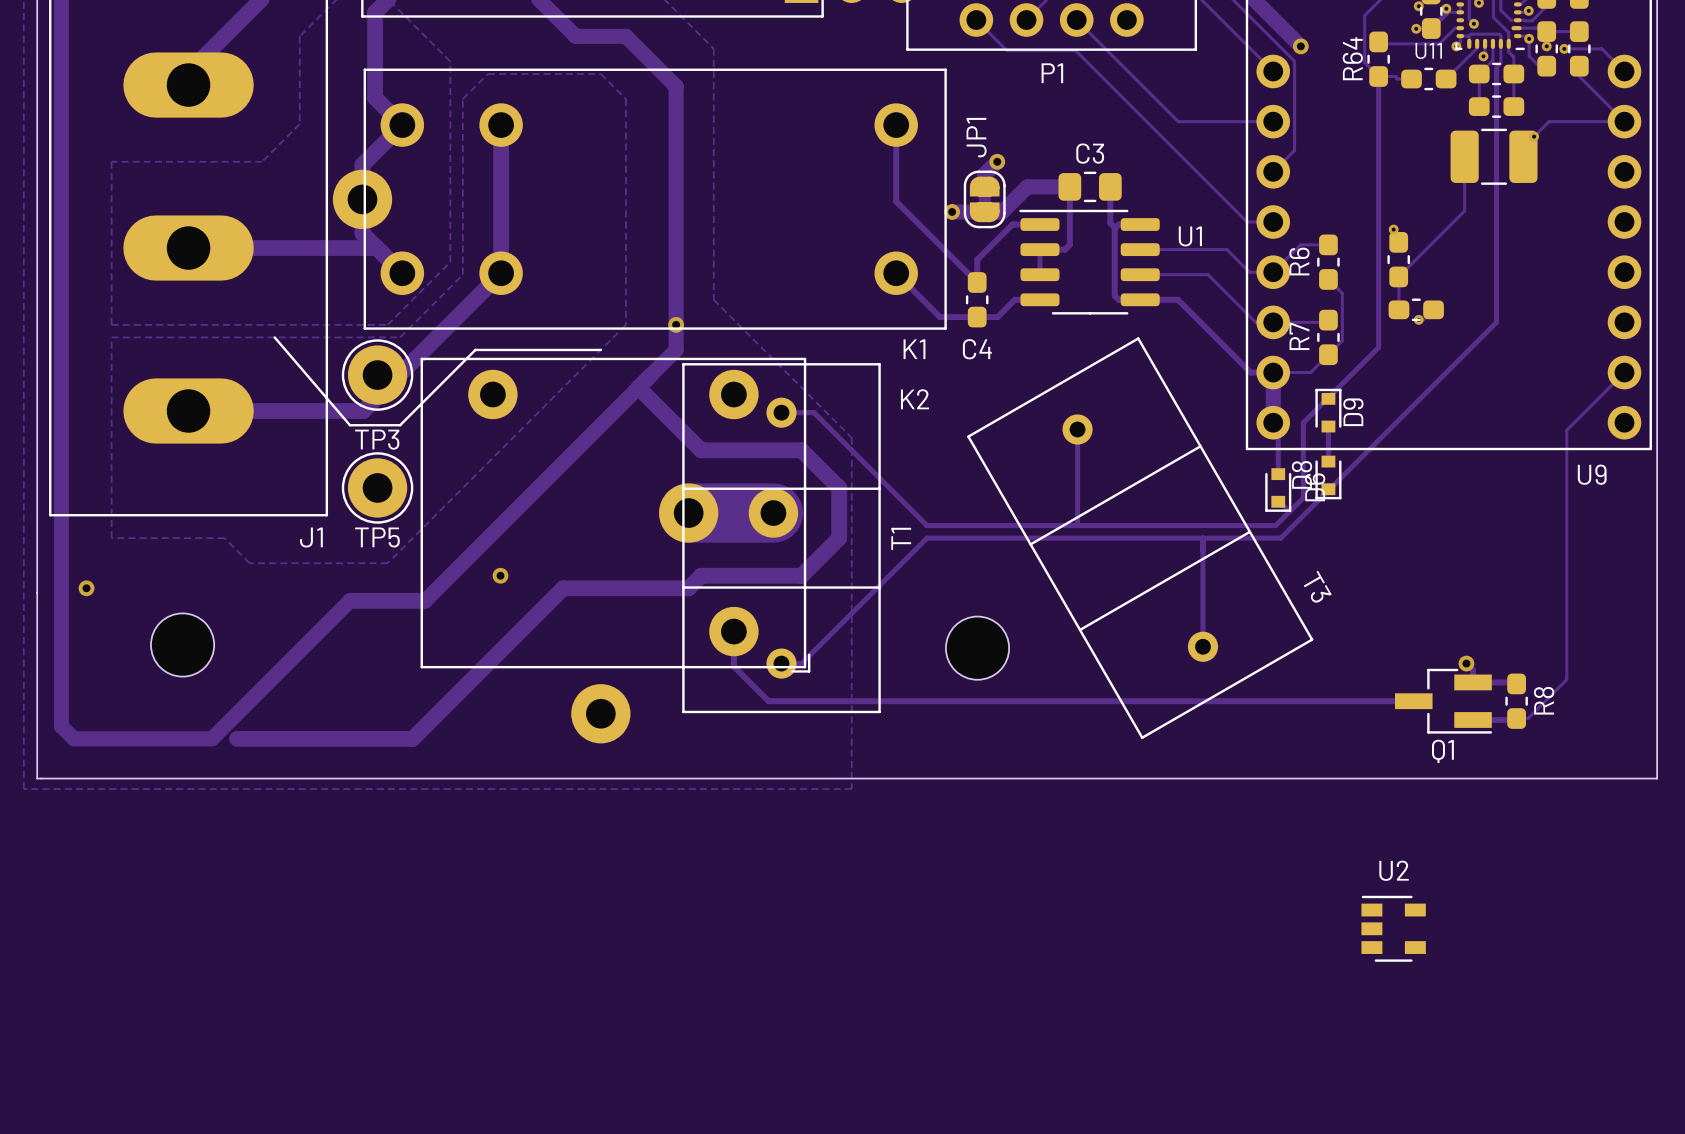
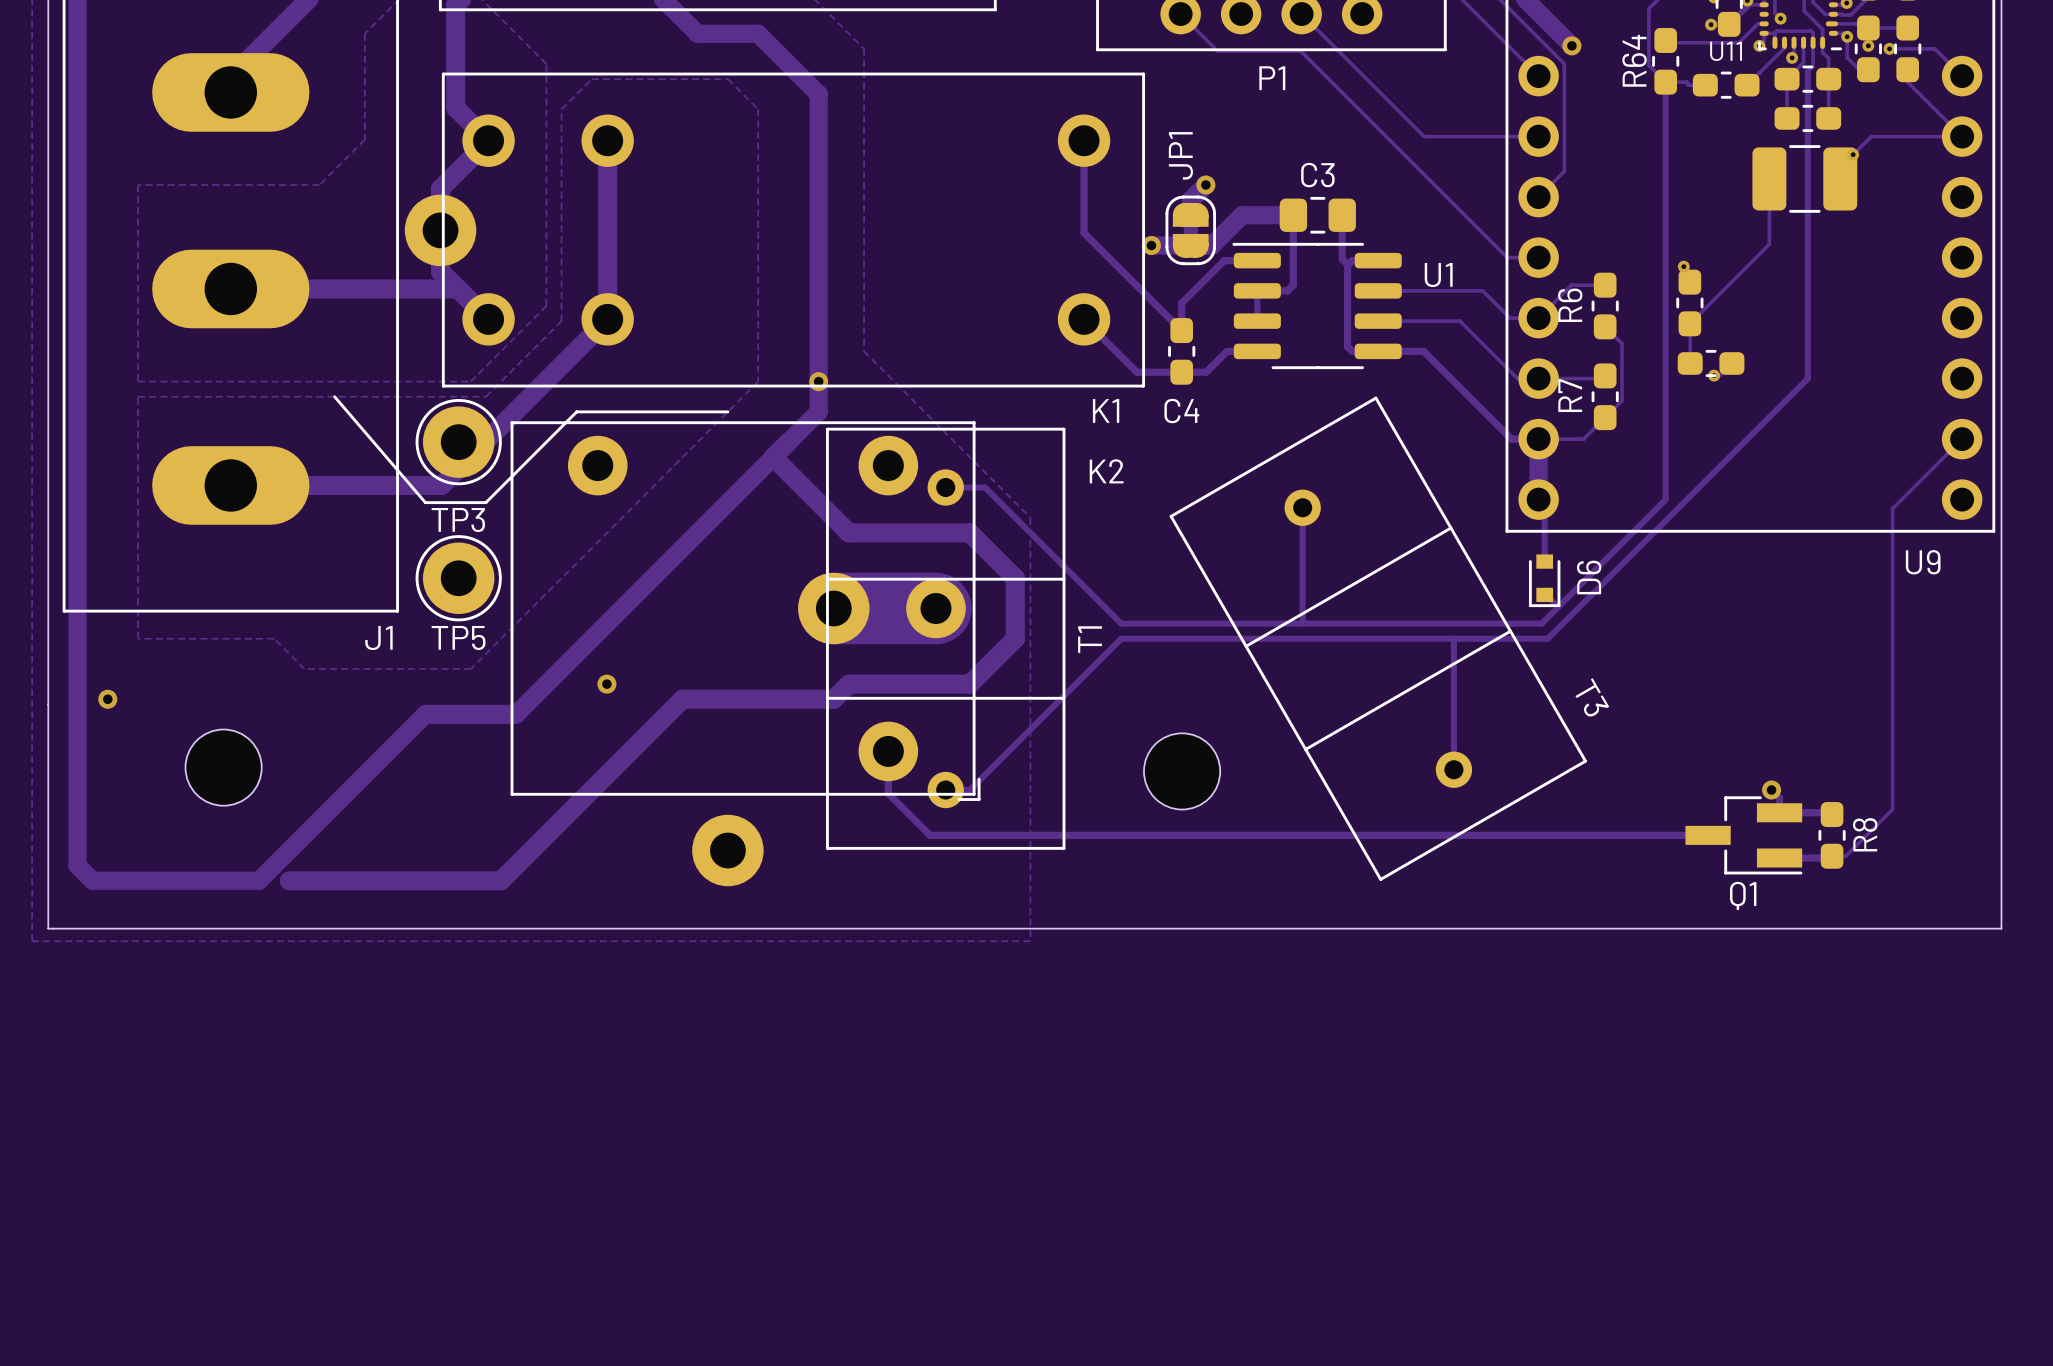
track: (1378, 347) (1303, 422) (1303, 497) -> (1665, 408) (1665, 499) (1574, 590)
D9: (1328, 410) -> none
track: (1328, 426) (1328, 461) -> none
D8: (1328, 477) -> none
U2: (1393, 928) -> none

